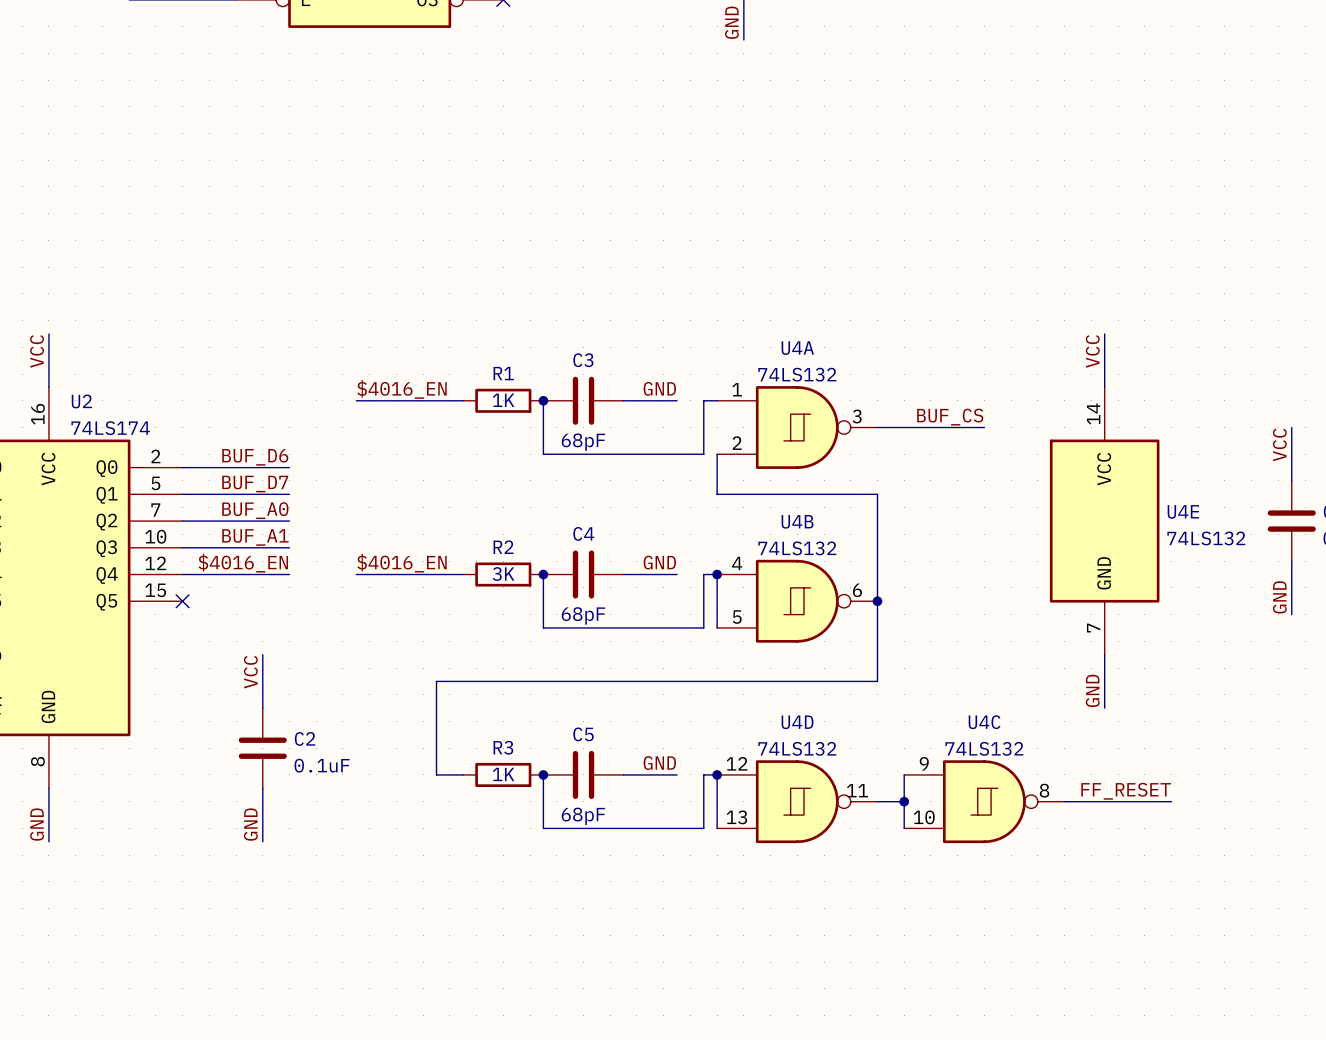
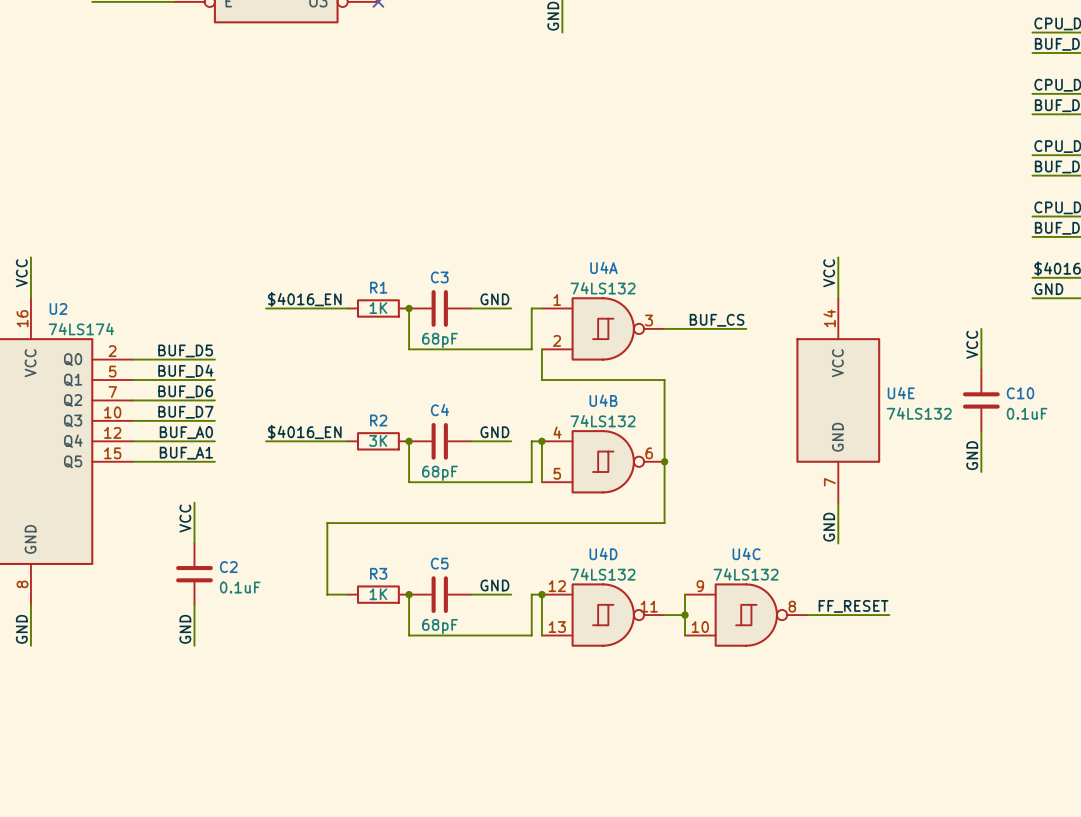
label: BUF_D6 (255, 457) -> BUF_D5 (185, 350)
label: BUF_D7 (255, 484) -> BUF_D4 (185, 371)
label: BUF_A0 (255, 510) -> BUF_D6 (185, 391)
label: BUF_A1 (255, 537) -> BUF_D7 (185, 412)
label: $4016_EN (243, 563) -> BUF_A0 (186, 432)
label: none -> BUF_A1 (186, 453)
wire: none -> (133, 461) (214, 461)
no-connect mark: (182, 601) -> none

